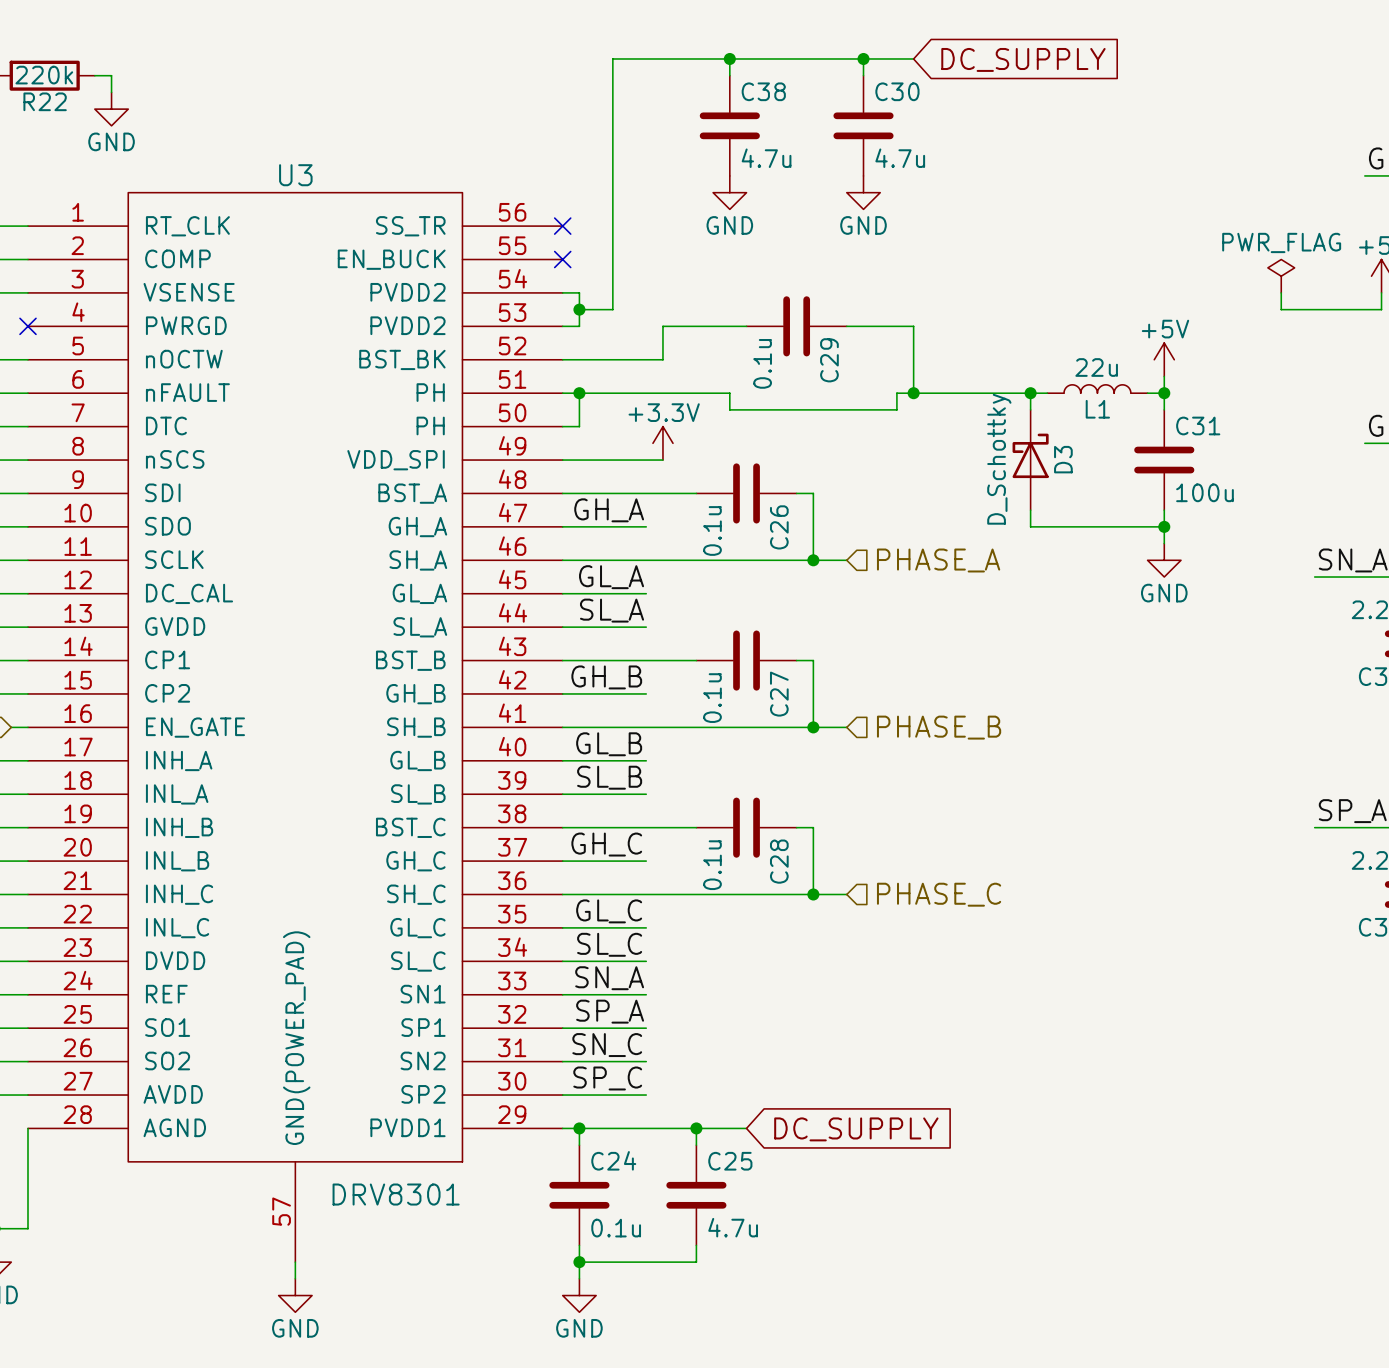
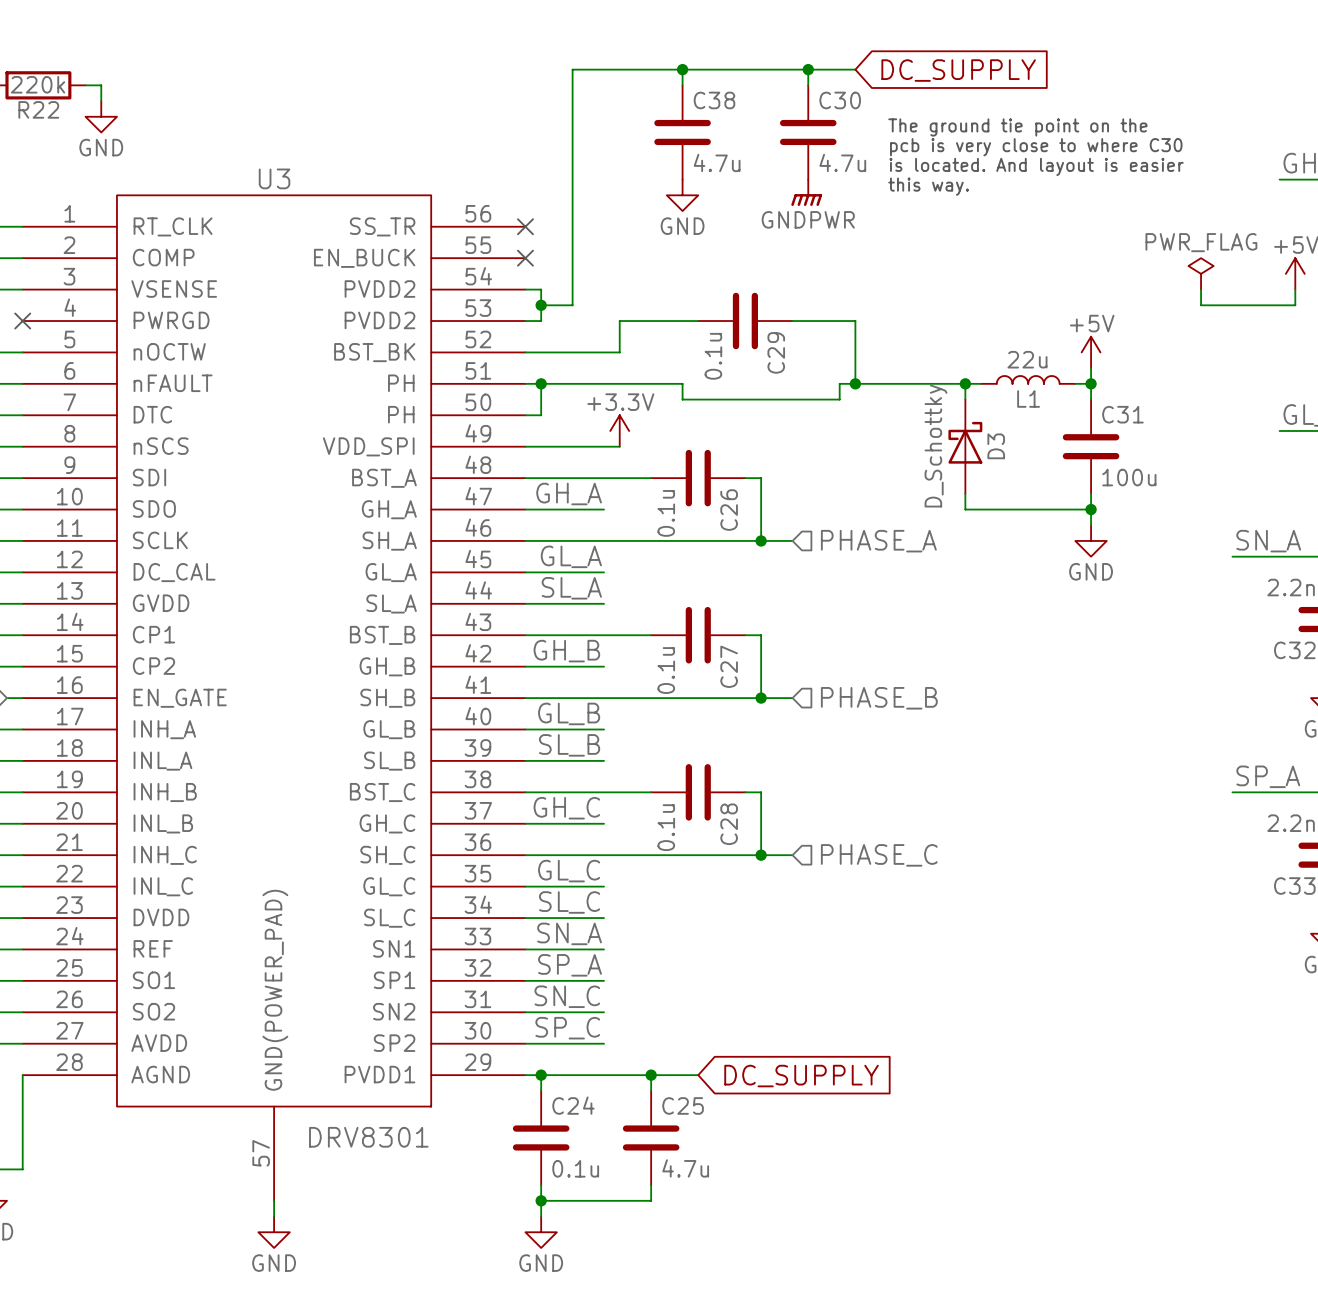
text: none -> The ground tie point on the (1017, 127)
text: none -> pcb is very close to where C30 (1036, 147)
text: none -> is located. And layout is easier (1036, 166)
text: none -> this way. (928, 186)
power symbol: GND (863, 192) -> GNDPWR (806, 192)

